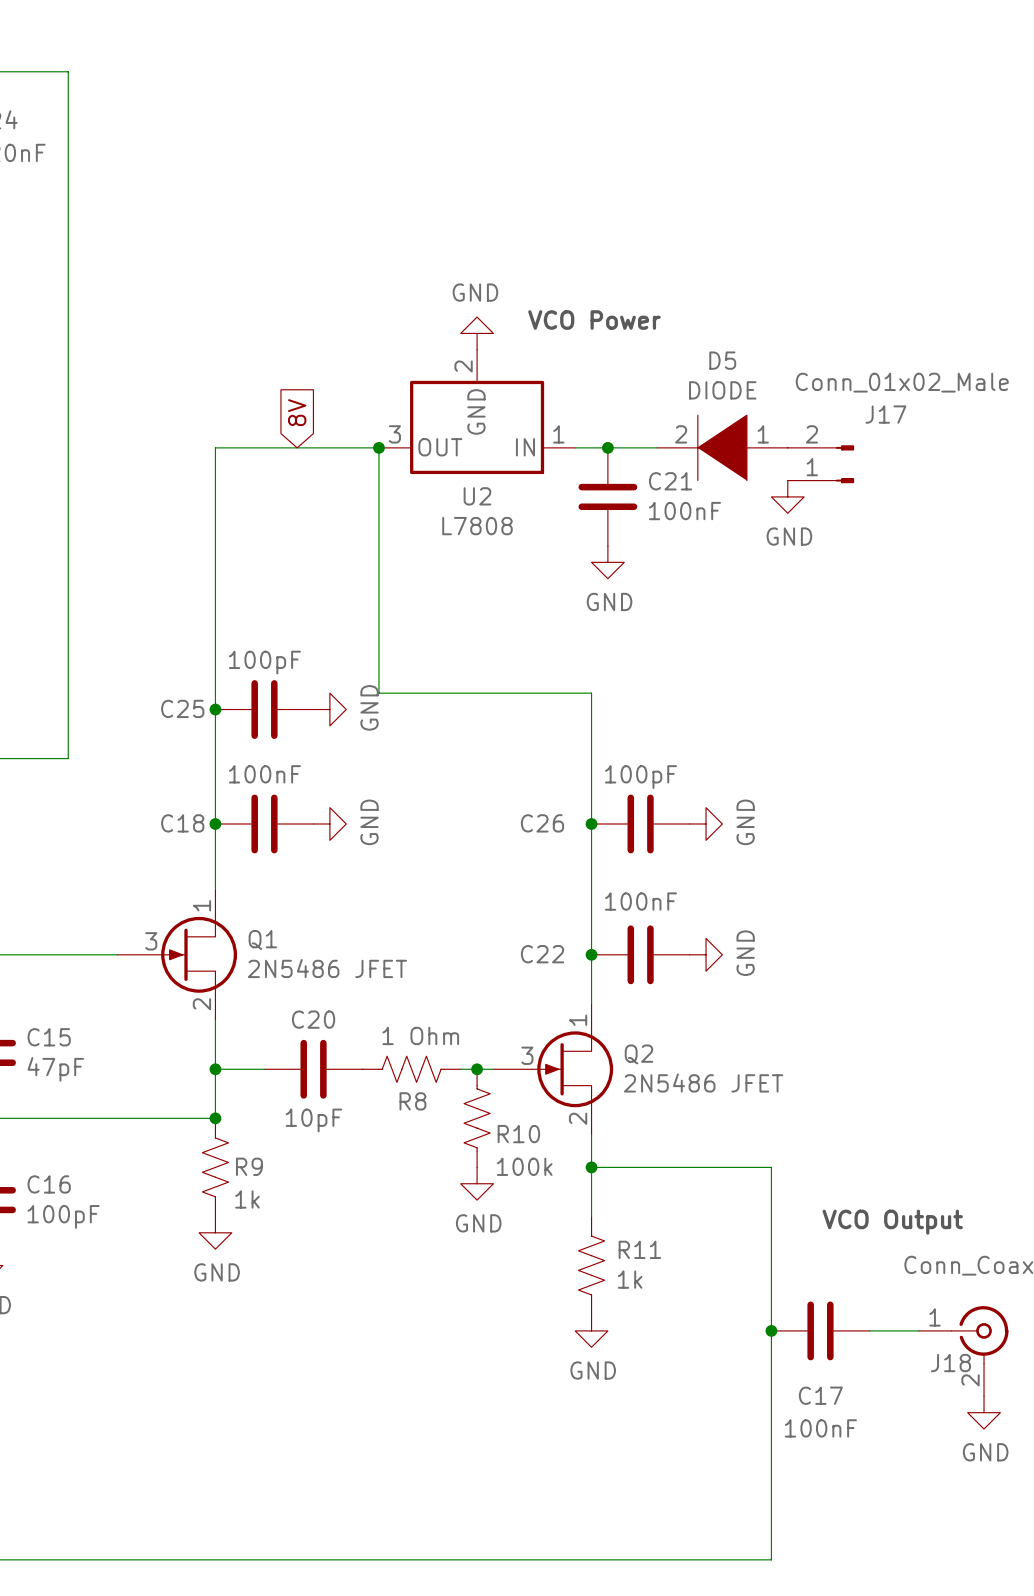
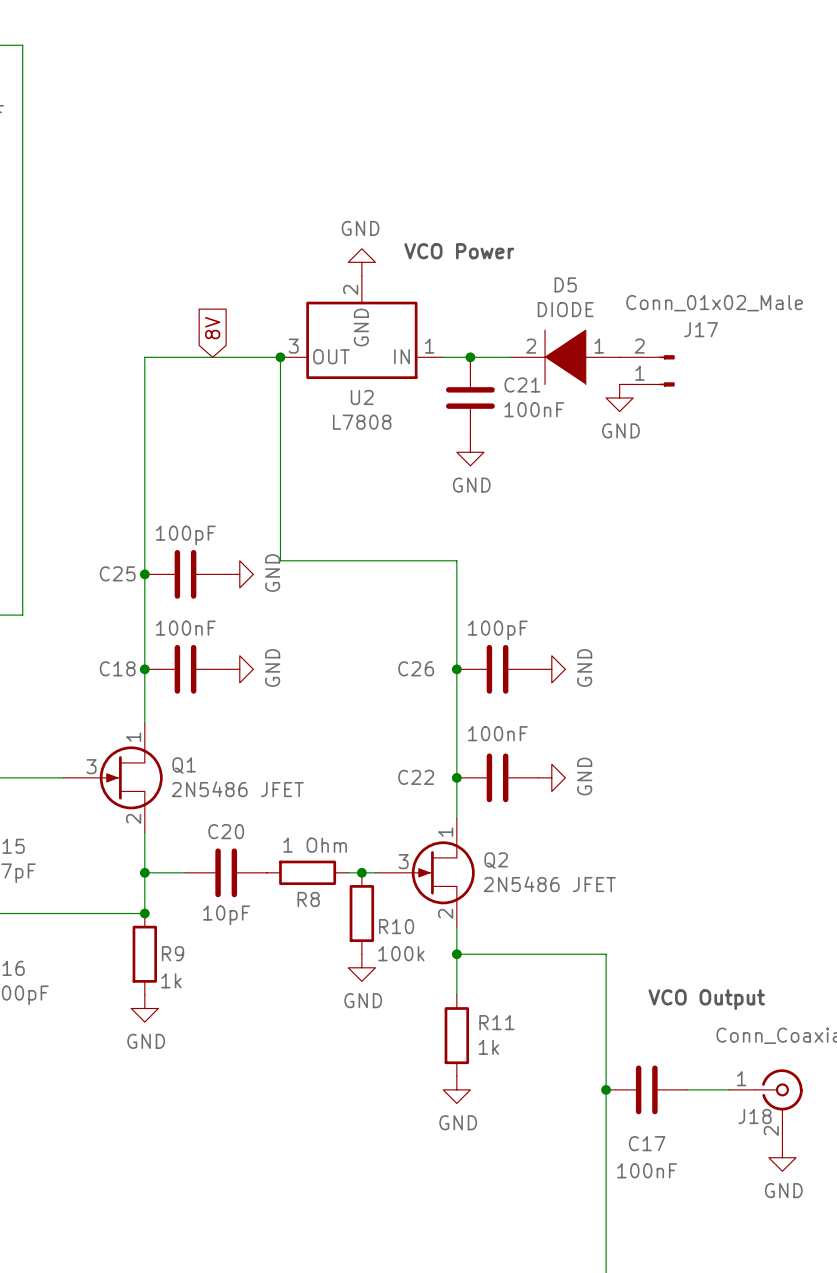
R8 symbol: [362, 1056, 461, 1083] -> [266, 860, 349, 886]
R10 symbol: [463, 1069, 491, 1168] -> [349, 872, 375, 955]
R9 symbol: [202, 1118, 229, 1217] -> [132, 913, 158, 995]
R11 symbol: [578, 1216, 605, 1315] -> [444, 994, 470, 1077]

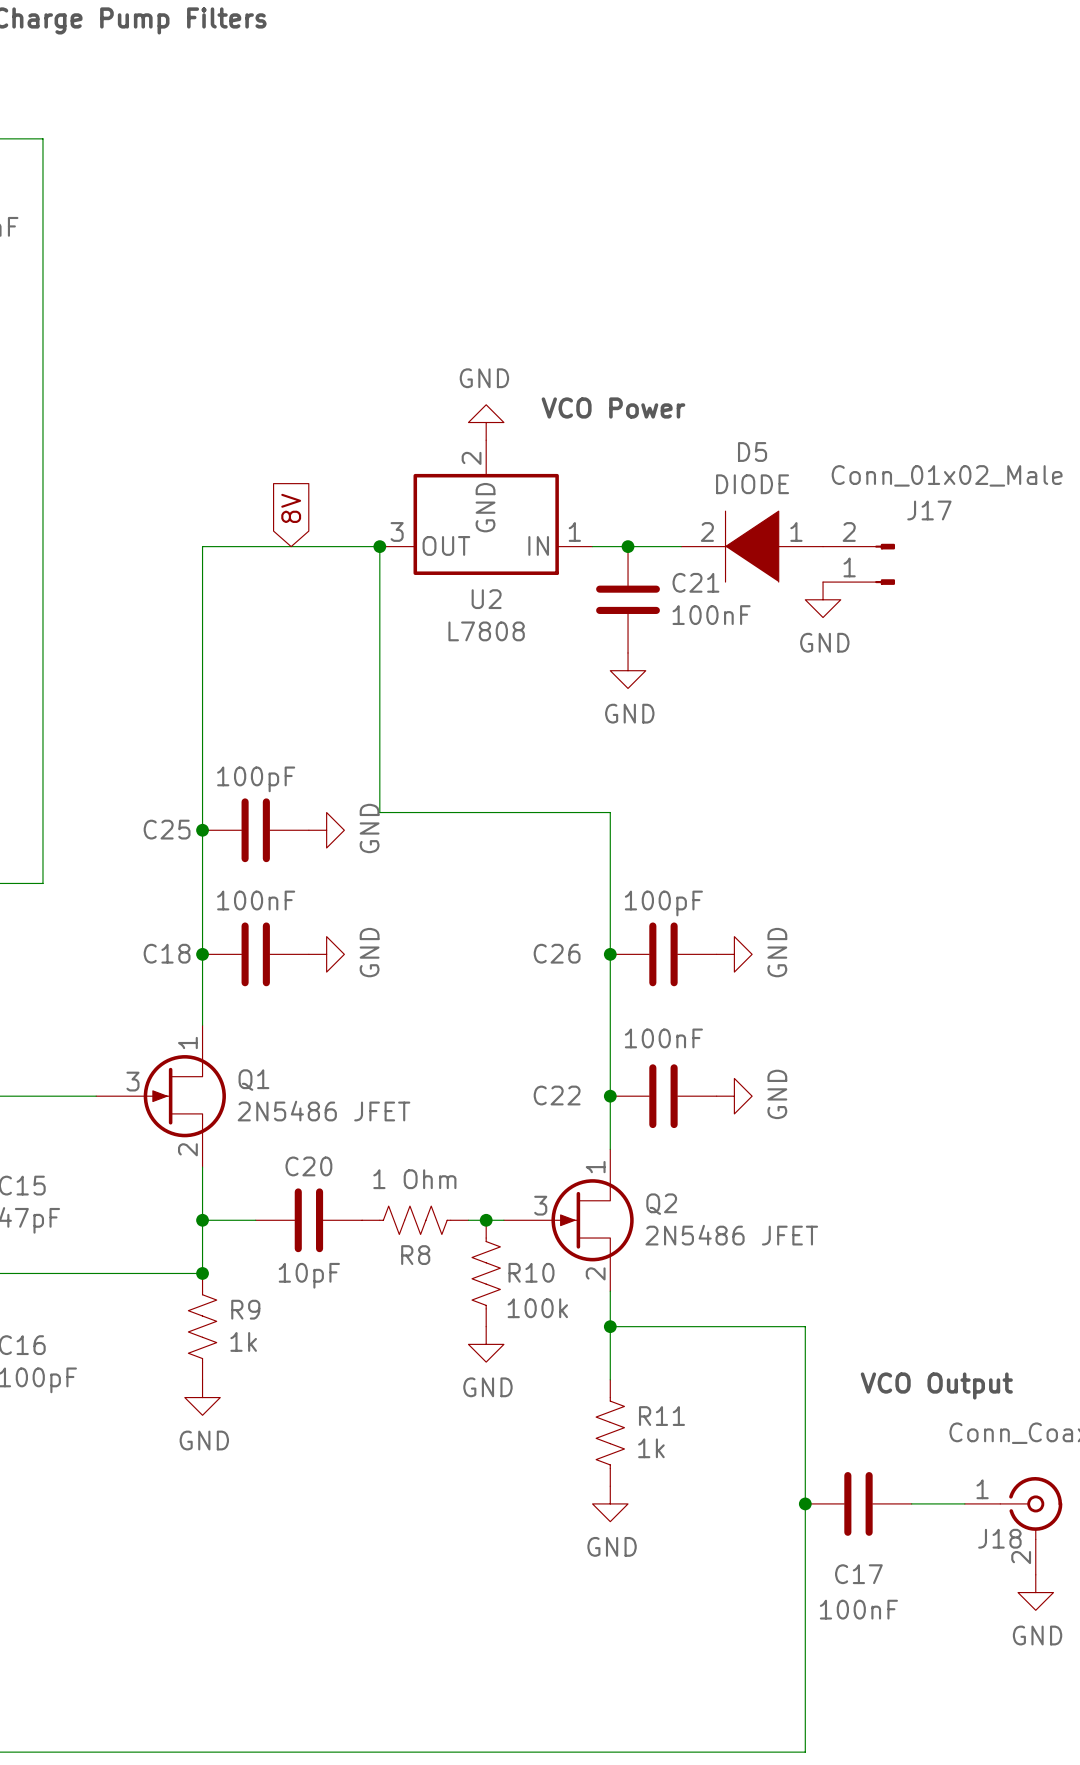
R8 symbol: [266, 860, 349, 886] -> [362, 1206, 469, 1235]
R10 symbol: [349, 872, 375, 955] -> [472, 1220, 501, 1327]
R9 symbol: [132, 913, 158, 995] -> [188, 1273, 217, 1380]
R11 symbol: [444, 994, 470, 1077] -> [596, 1379, 625, 1487]

